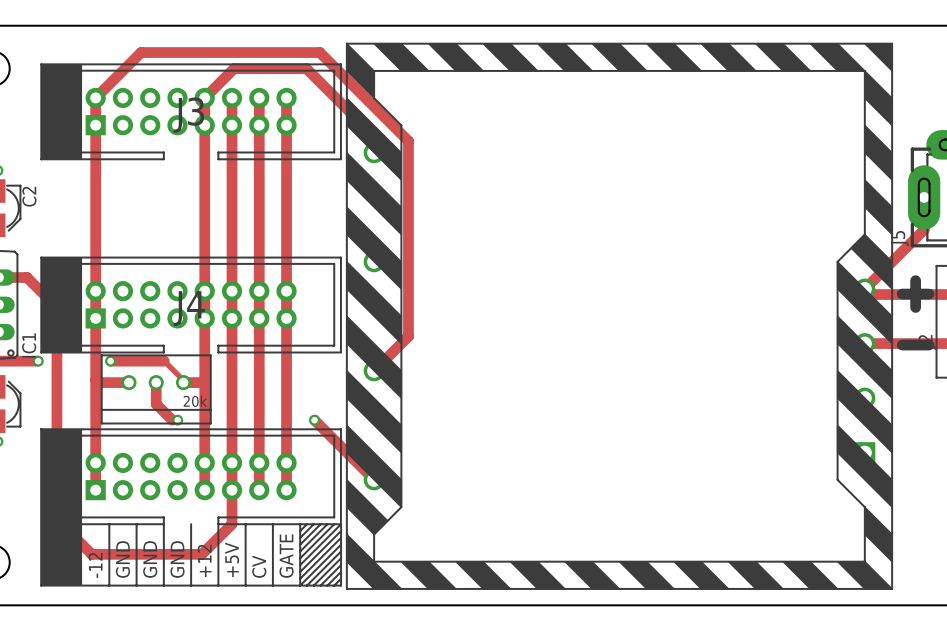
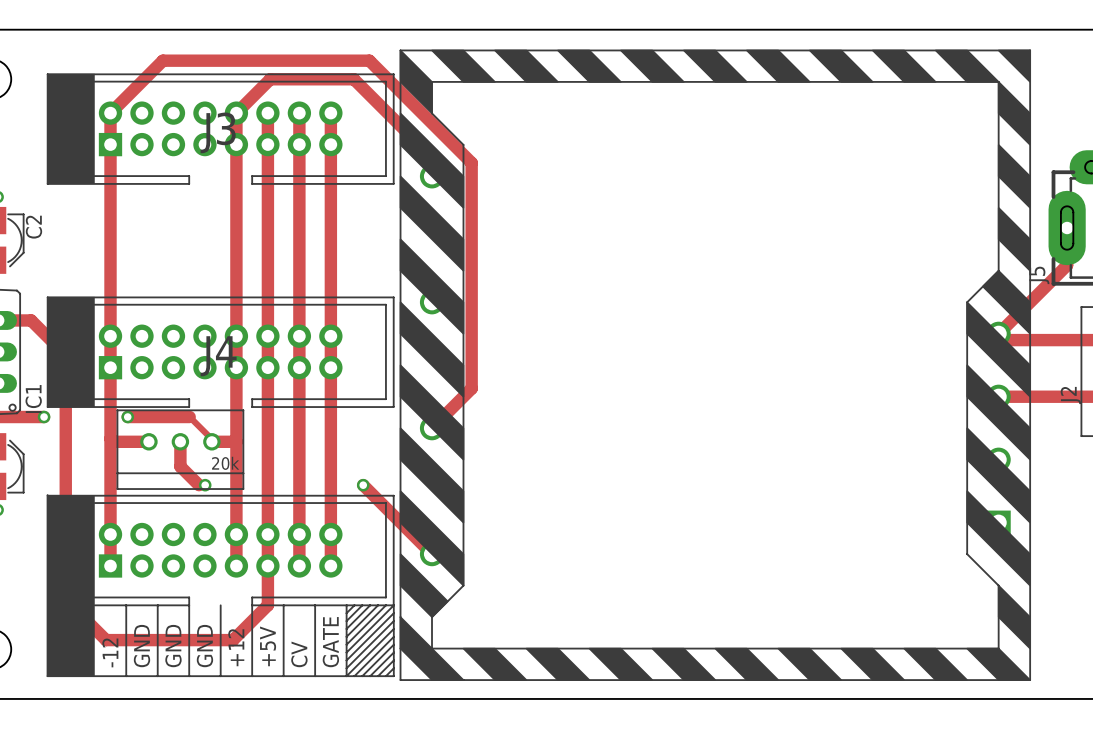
line: (915, 280) (915, 307) -> none
line: (902, 294) (929, 294) -> none
line: (902, 345) (929, 345) -> none

